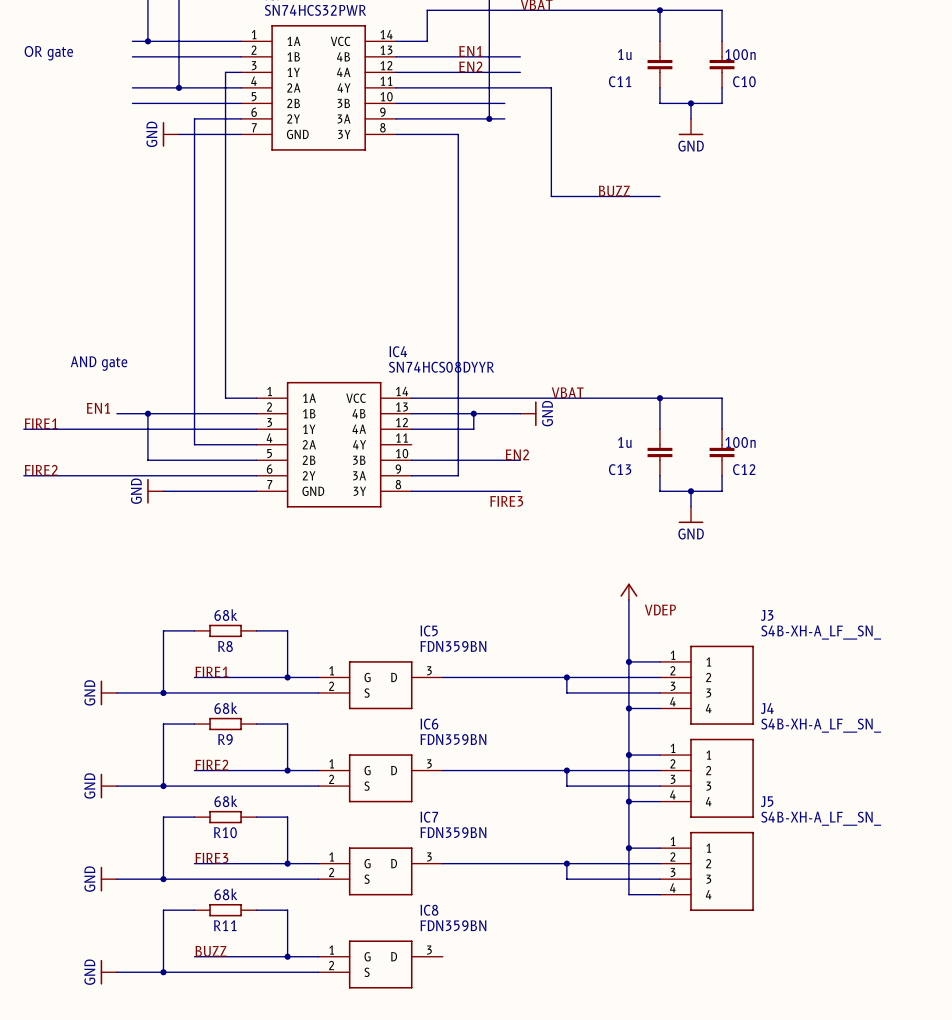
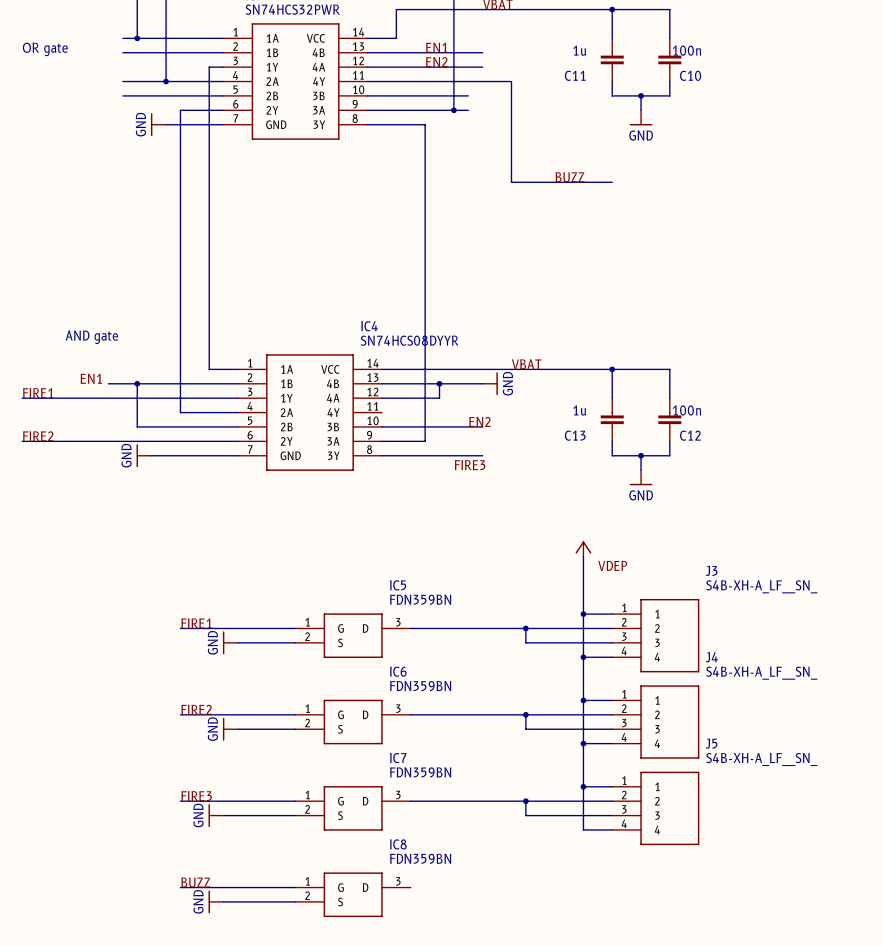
wire: (194, 630) (163, 630) (163, 692) -> none
R8: 68k (225, 630) -> none
wire: (256, 630) (287, 630) (287, 677) -> none
junction: (287, 677) -> none
power symbol: GND (108, 692) -> none
wire: (116, 692) (256, 692) -> none
junction: (163, 692) -> none
power symbol: none -> GND (230, 642)
wire: (194, 724) (163, 724) (163, 786) -> none
R9: 68k (225, 724) -> none
wire: (256, 724) (287, 724) (287, 770) -> none
junction: (287, 770) -> none
power symbol: GND (108, 786) -> none
wire: (116, 786) (256, 786) -> none
junction: (163, 786) -> none
power symbol: none -> GND (230, 729)
wire: (194, 817) (163, 817) (163, 879) -> none
R10: 68k (225, 817) -> none
wire: (256, 817) (287, 817) (287, 863) -> none
junction: (287, 863) -> none
power symbol: GND (108, 879) -> none
wire: (116, 879) (241, 879) -> none
junction: (163, 879) -> none
power symbol: none -> GND (216, 815)
wire: (194, 910) (163, 910) (163, 972) -> none
R11: 68k (225, 910) -> none
wire: (256, 910) (287, 910) (287, 956) -> none
junction: (287, 956) -> none
power symbol: GND (108, 972) -> none
wire: (116, 972) (241, 972) -> none
junction: (163, 972) -> none
power symbol: none -> GND (216, 901)

